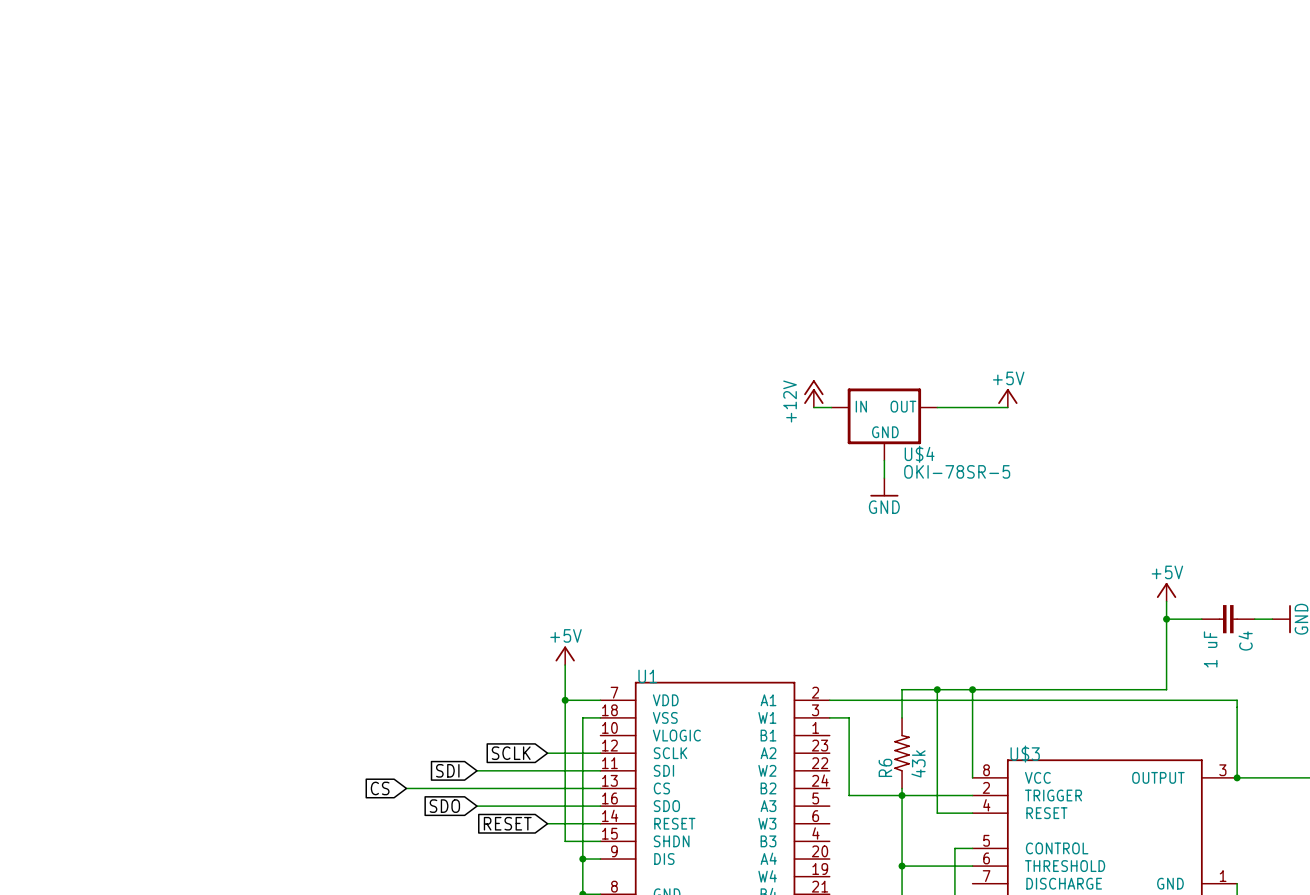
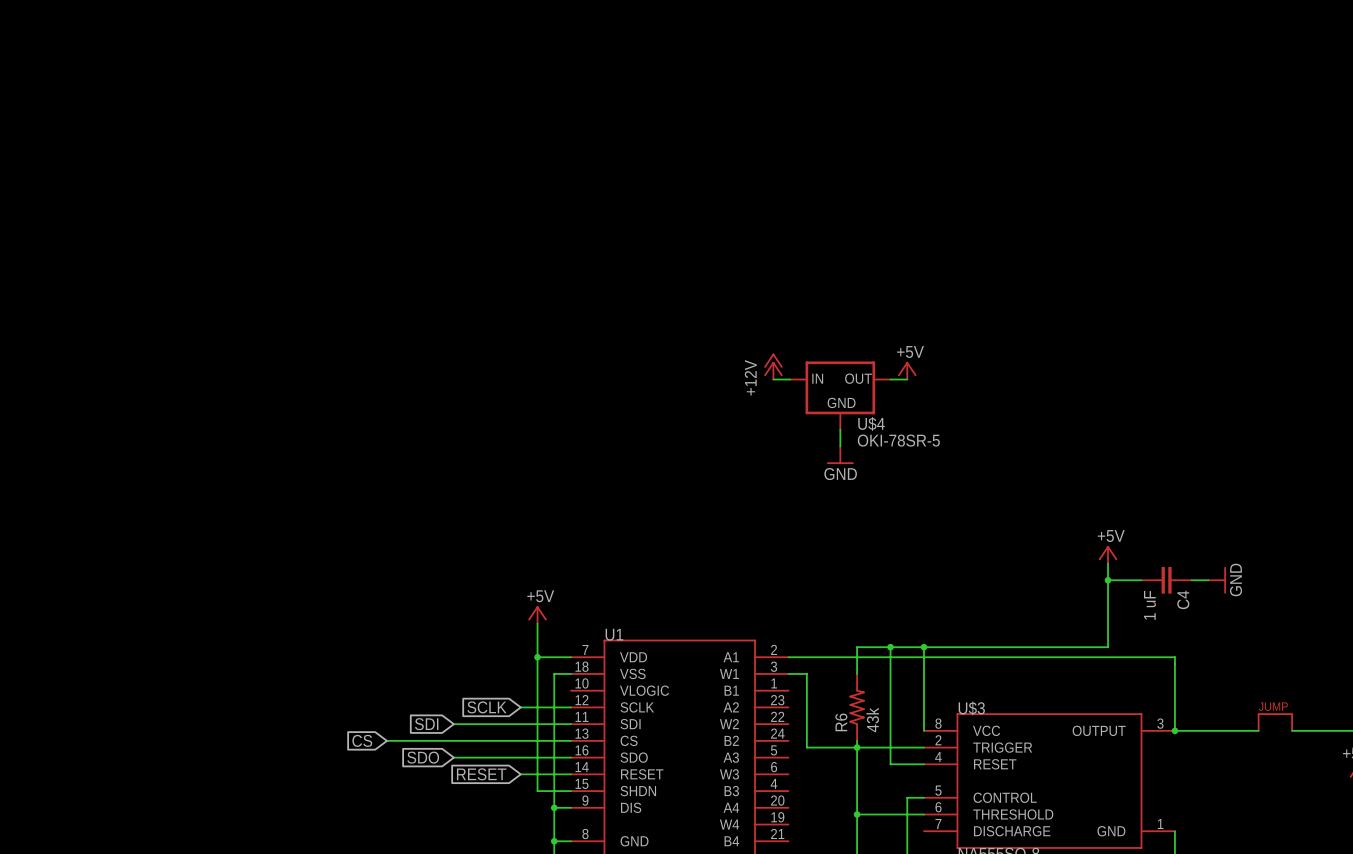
power symbol position: +5V (1007, 398) -> +5V (907, 370)
wire: (954, 407) (1007, 407) -> none

